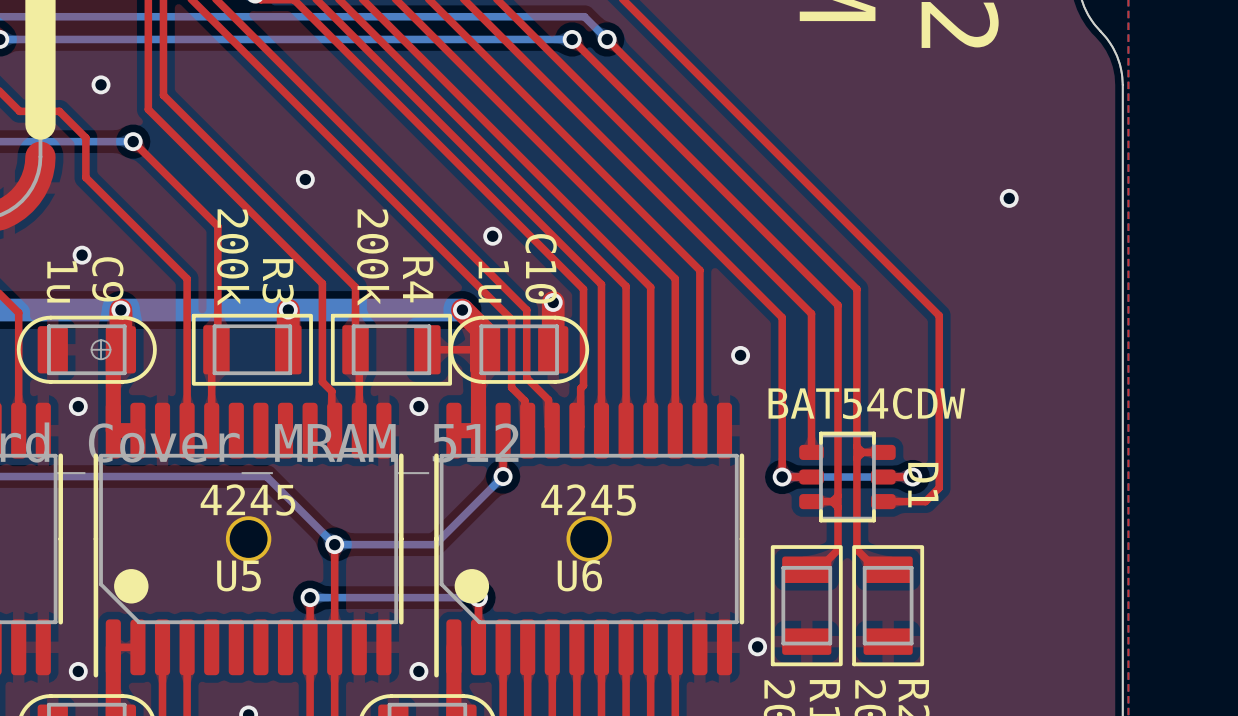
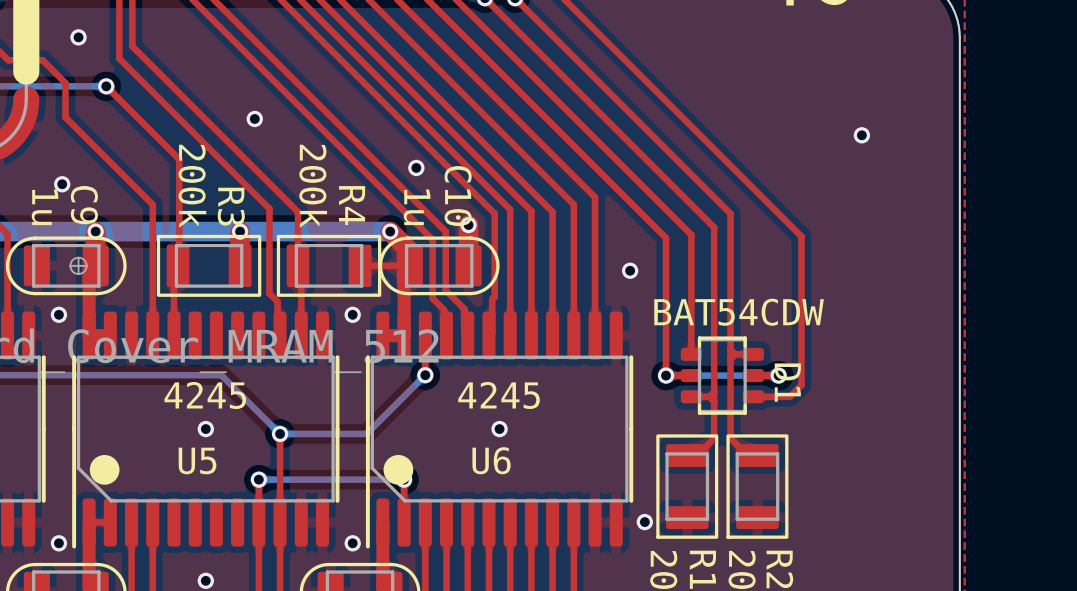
part: (248, 538) -> none
via: none -> (205, 429)
part: (589, 538) -> none
via: none -> (499, 429)

